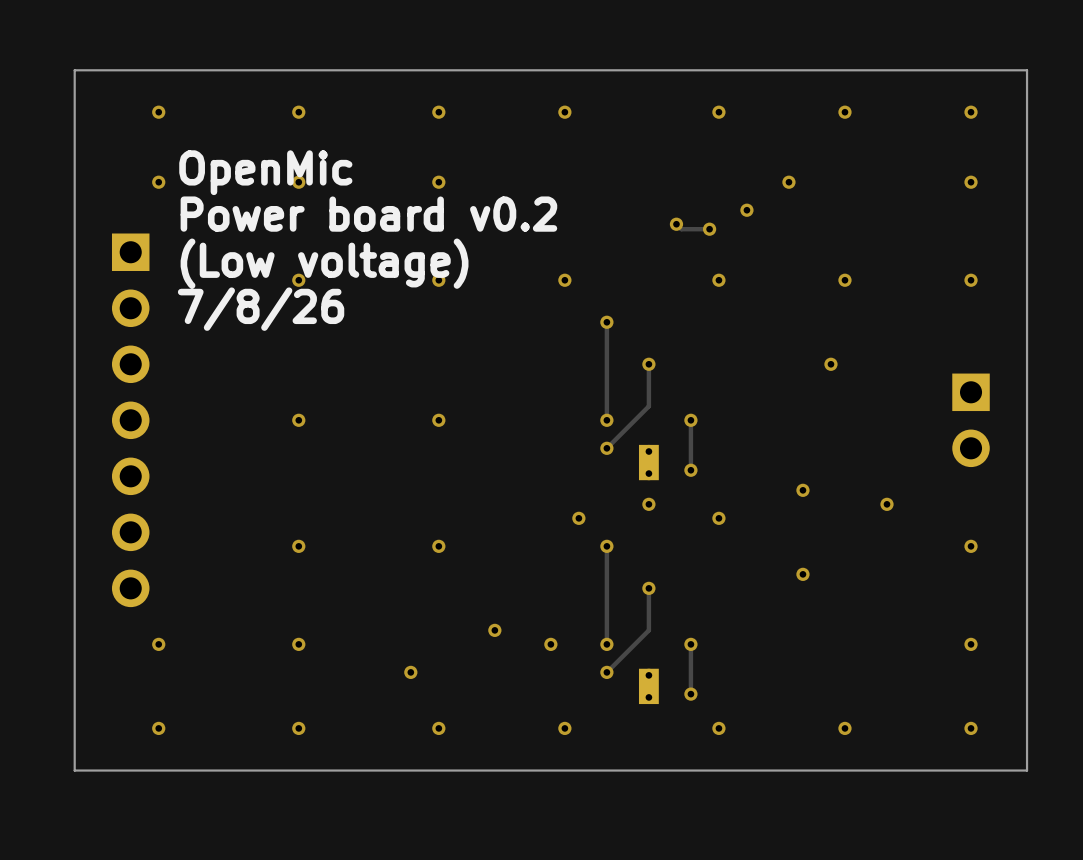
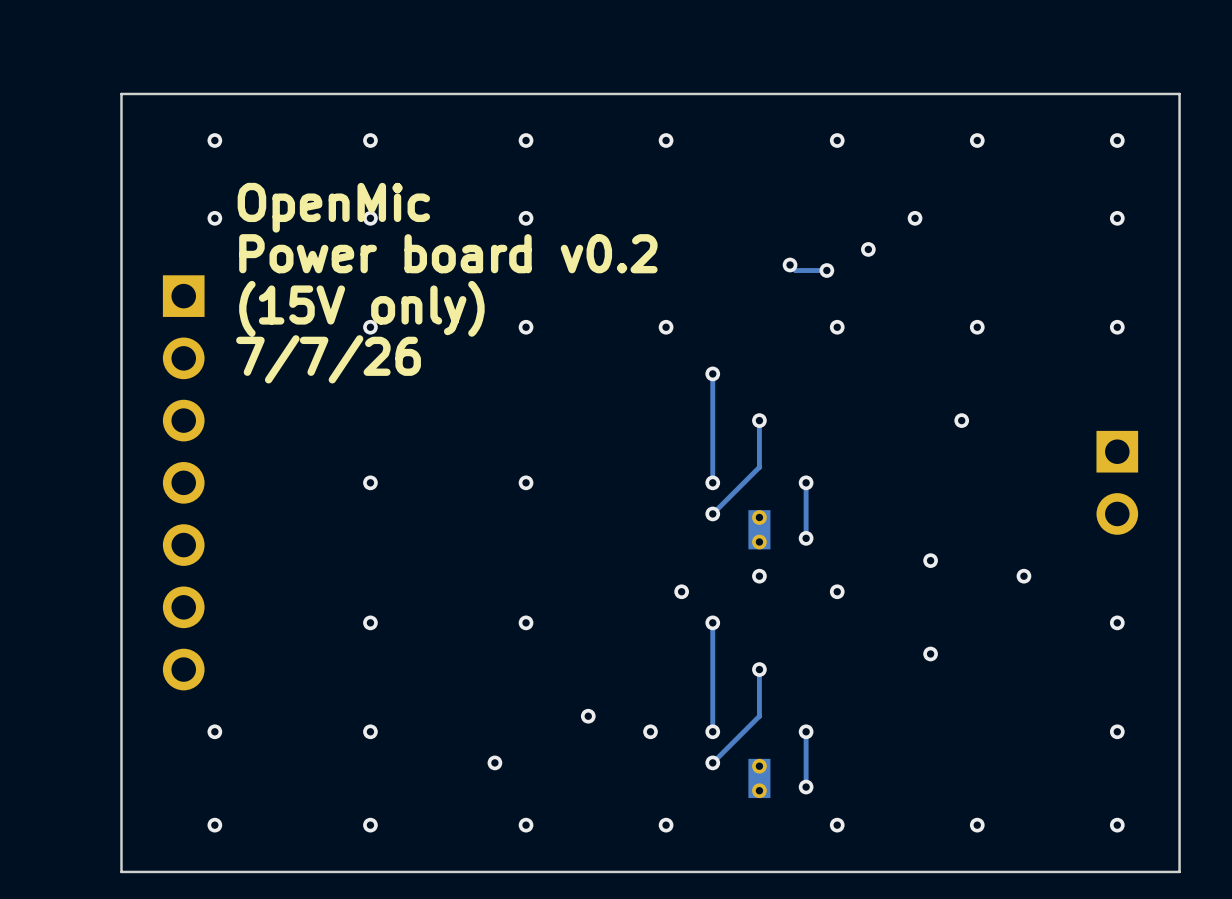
text: (Low voltage) (324, 263) -> (15V only) (361, 308)
text: 7/8/26 (261, 309) -> 7/7/26 (328, 359)

